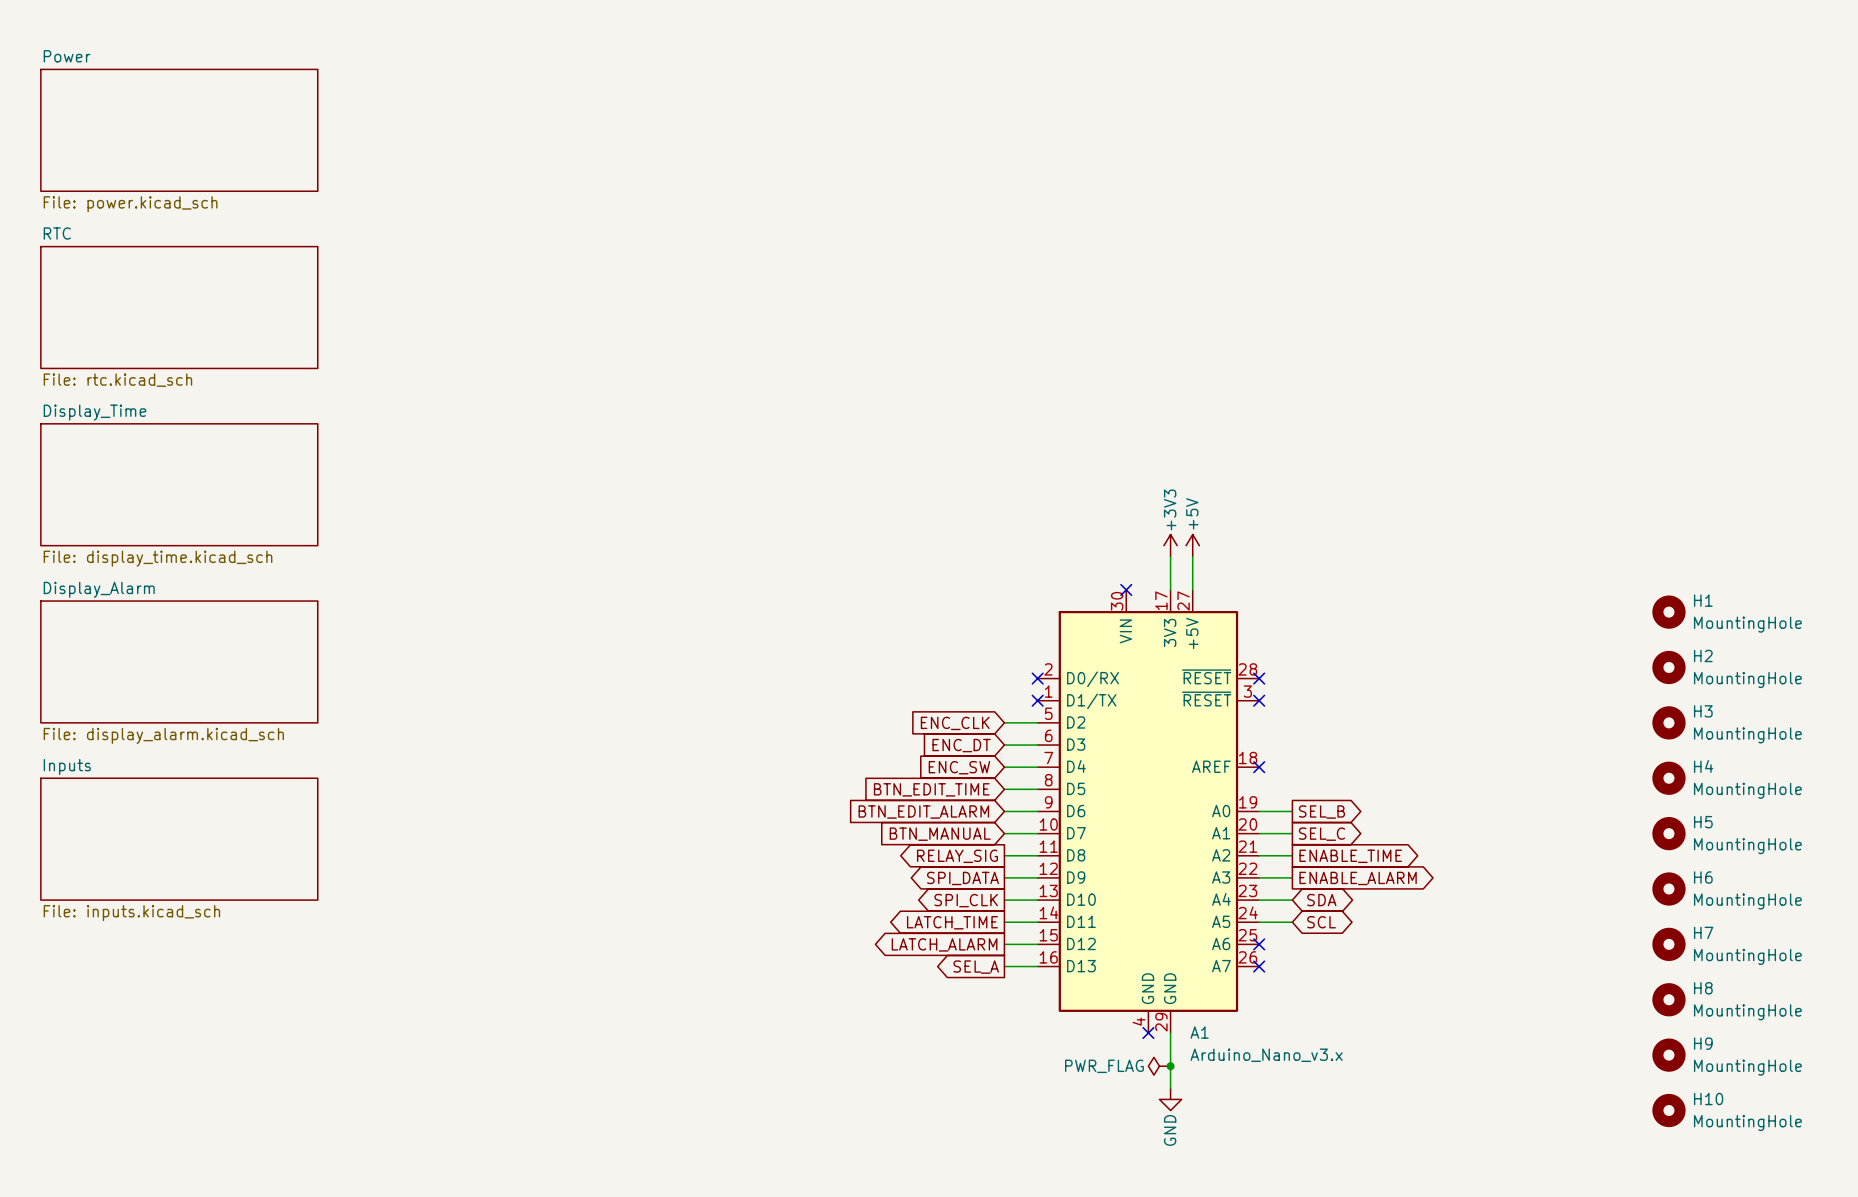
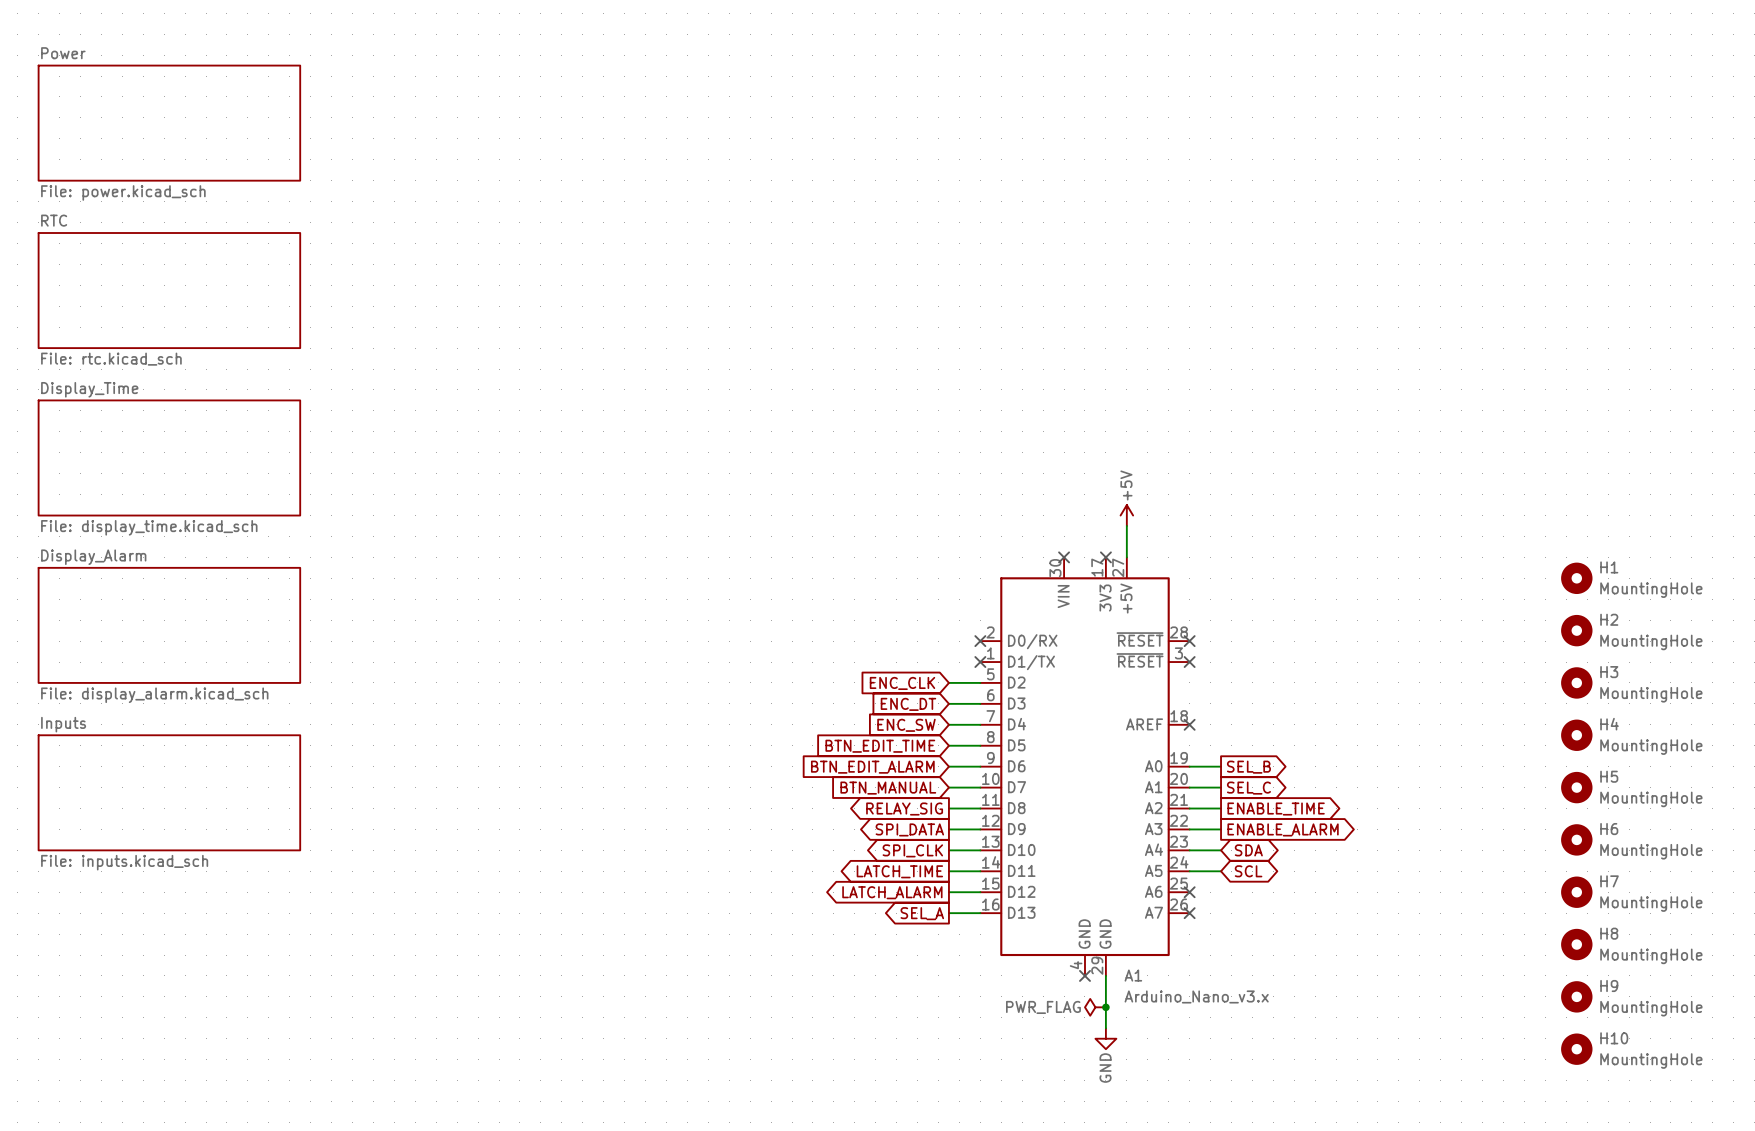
power symbol: +3V3 (1170, 545) -> none
wire: (1170, 556) (1170, 589) -> none
no-connect mark: none -> (1105, 557)

